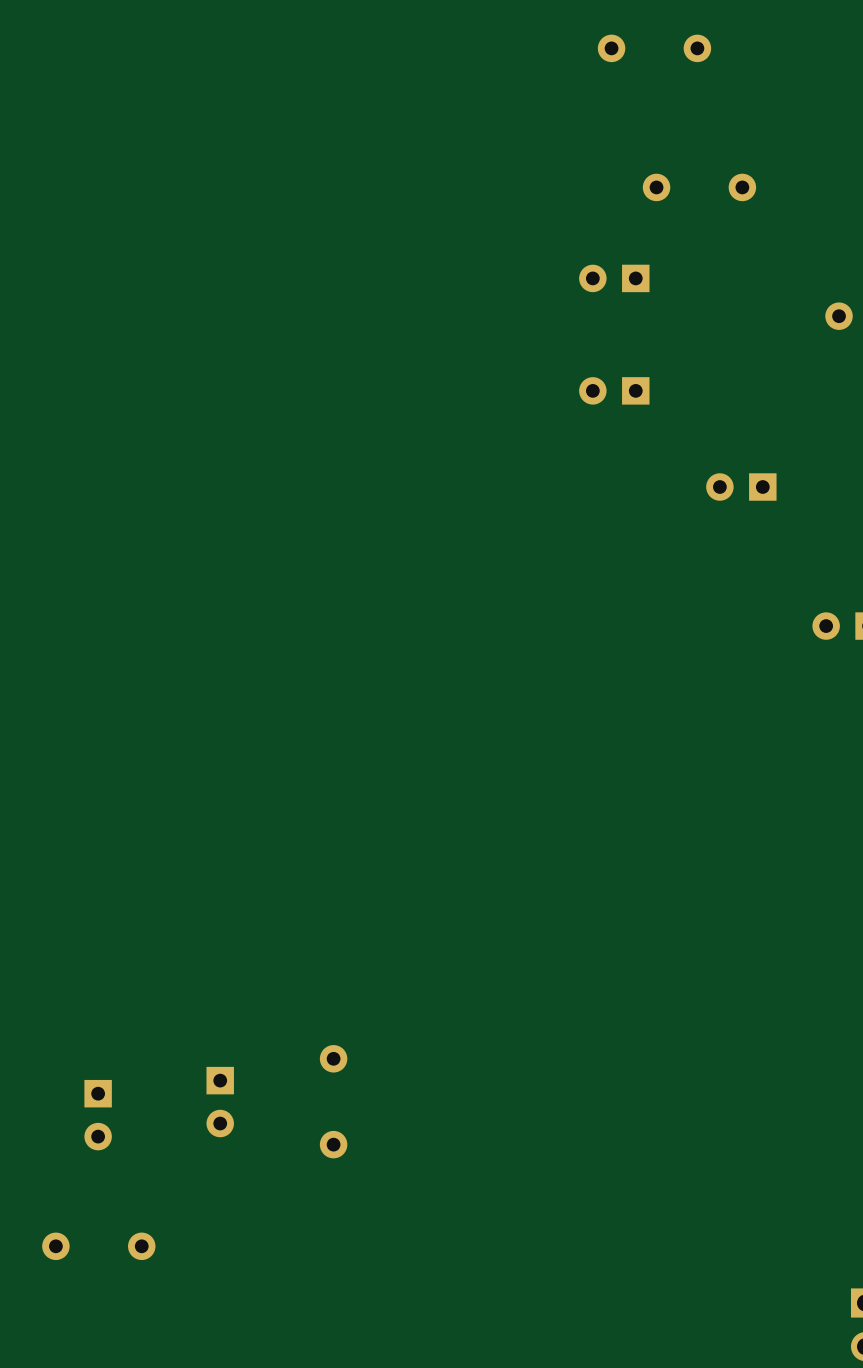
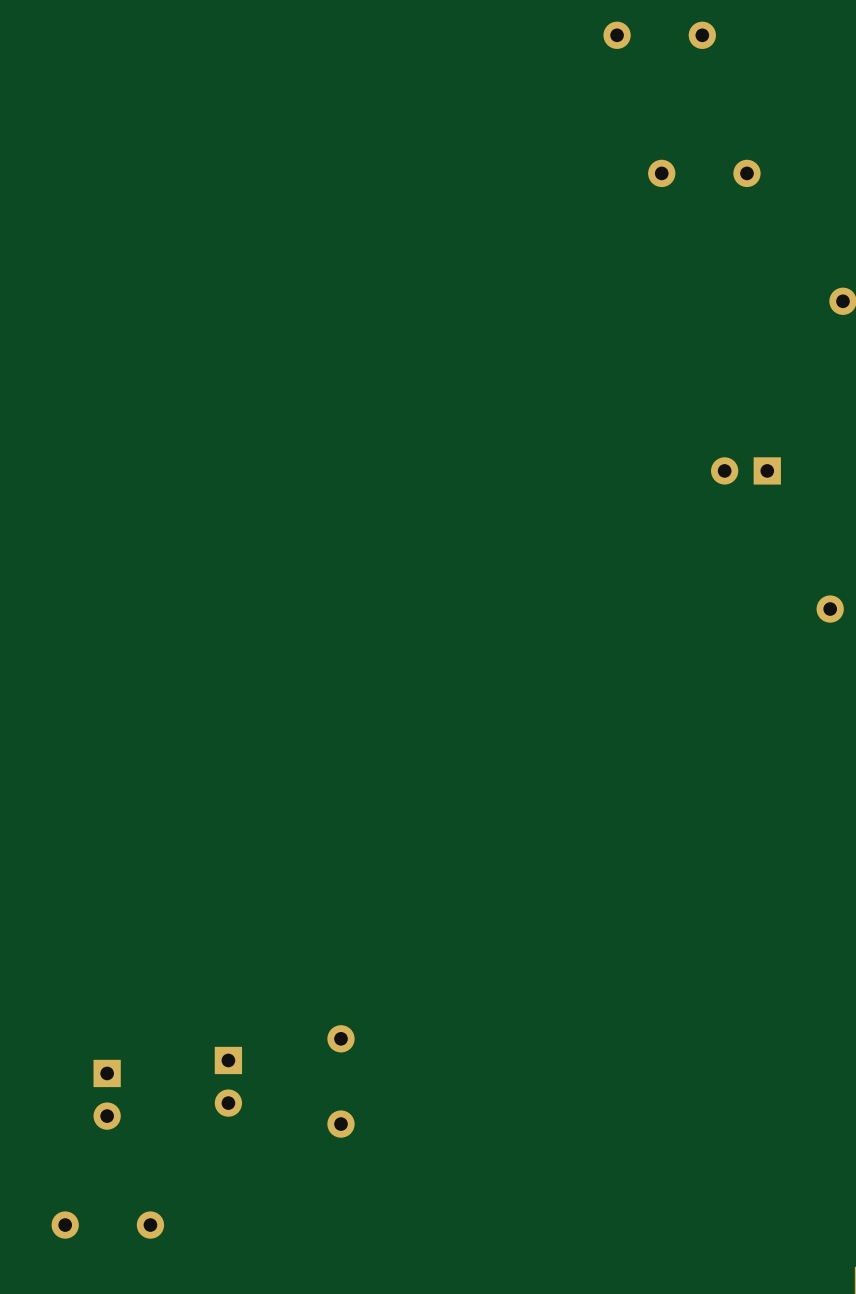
part: (614, 278) -> none
part: (614, 390) -> none

